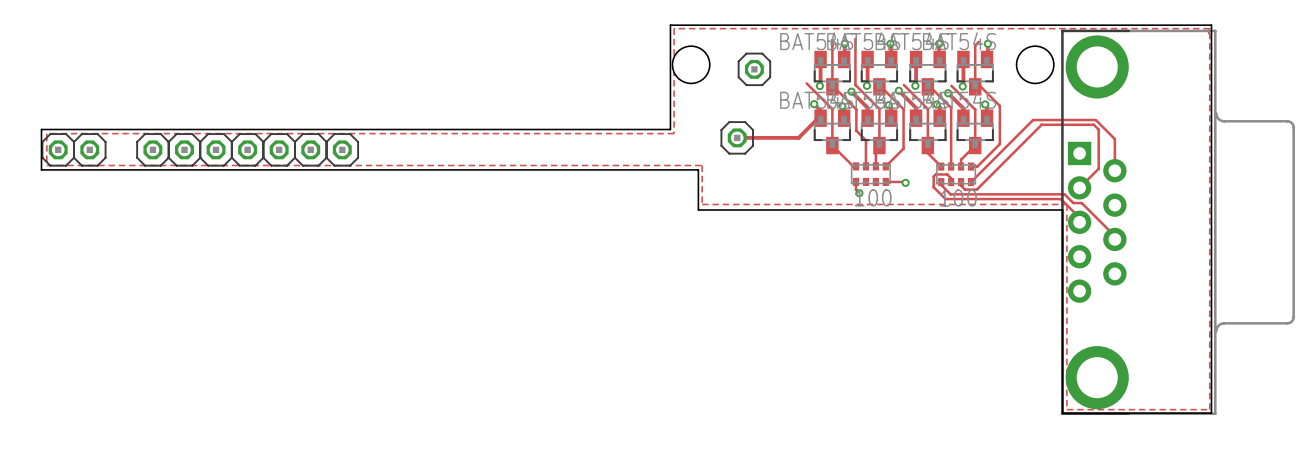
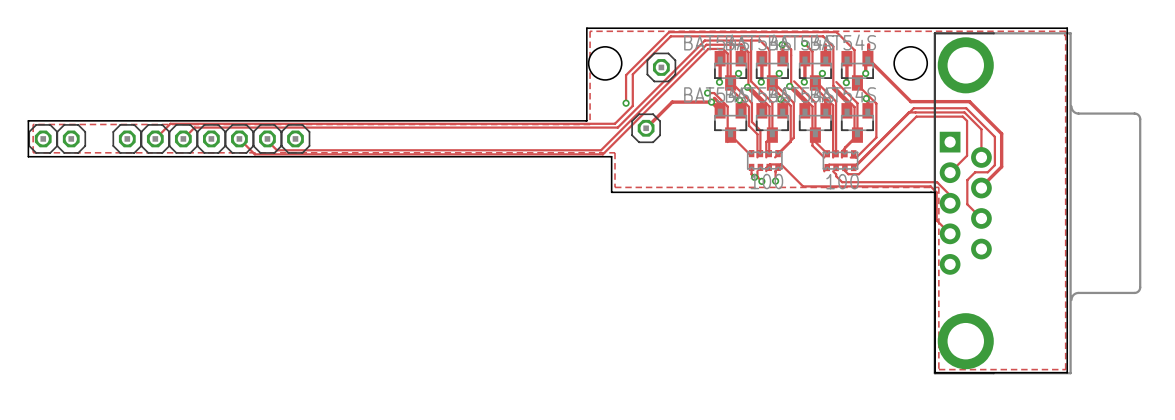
track: (978, 41) (975, 45) (975, 86) (980, 86) (999, 105) (999, 144) (977, 166) (971, 166) -> none
track: none -> (785, 43) (791, 49) (791, 85) (812, 106) (812, 145) (824, 157)
track: none -> (804, 43) (812, 51) (812, 86) (833, 105) (833, 157)
via: none -> (804, 43)
via: (844, 43) -> none
via: (939, 43) -> none
via: (987, 43) -> none
via: none -> (738, 73)
via: none -> (779, 73)
via: none -> (822, 73)
track: none -> (865, 73) (865, 61) (870, 61) (910, 101) (969, 101) (1001, 133) (1001, 166) (981, 188)
via: none -> (865, 73)
track: (806, 83) (832, 109) (832, 149) -> none
via: (948, 93) -> none
track: none -> (707, 93) (714, 93) (727, 106) (727, 142)
via: none -> (707, 93)
via: (814, 104) -> none
via: (936, 104) -> none
via: none -> (711, 102)
track: none -> (626, 103) (626, 75) (669, 32) (836, 32) (854, 50) (854, 86) (859, 86) (876, 103) (876, 137) (856, 157) (850, 157)
via: none -> (626, 103)
track: (820, 115) (798, 137) (737, 137) -> (717, 114) (717, 107) (711, 102) (672, 102) (646, 128)
track: none -> (155, 138) (170, 123) (614, 123) (632, 105) (632, 74) (670, 36) (823, 36) (833, 46) (833, 85) (854, 106) (854, 138) (841, 151) (841, 157)
track: none -> (183, 138) (194, 127) (617, 127) (704, 40) (760, 40) (769, 49) (769, 86) (790, 105) (790, 141) (775, 157)
track: none -> (239, 138) (254, 154) (602, 154) (708, 48) (723, 48) (727, 53) (727, 86) (748, 106) (748, 125) (757, 134) (757, 157)
track: none -> (267, 138) (276, 150) (601, 150) (706, 44) (740, 44) (748, 52) (748, 85) (769, 106) (769, 138) (766, 142) (766, 157)
track: (885, 181) (905, 182) -> none
via: (905, 182) -> none
track: (941, 182) (941, 184) (950, 194) (1064, 194) (1073, 203) (1081, 203) (1114, 236) (1114, 239) -> (824, 171) (829, 164) (857, 164) (913, 108) (966, 108) (994, 136) (994, 165) (987, 172) (975, 172) (967, 180) (967, 204) (981, 218)
track: (951, 182) (951, 178) (947, 174) (935, 174) (933, 176) (933, 187) (945, 199) (1060, 199) (1079, 217) -> (833, 171) (842, 182) (937, 182) (950, 195) (950, 199)
track: none -> (757, 171) (757, 176) (761, 181)
track: none -> (766, 171) (769, 164) (781, 164) (803, 186) (930, 186) (936, 192) (936, 220) (950, 233)
track: none -> (775, 171) (775, 181)
via: none -> (761, 181)
via: none -> (775, 181)

